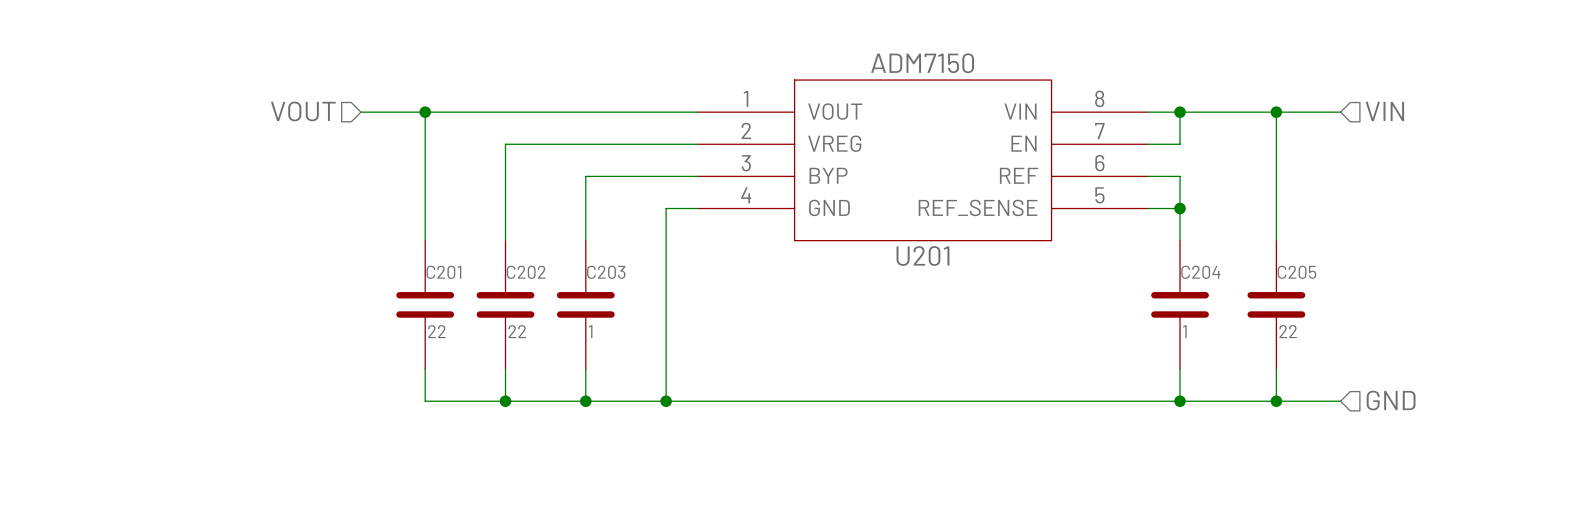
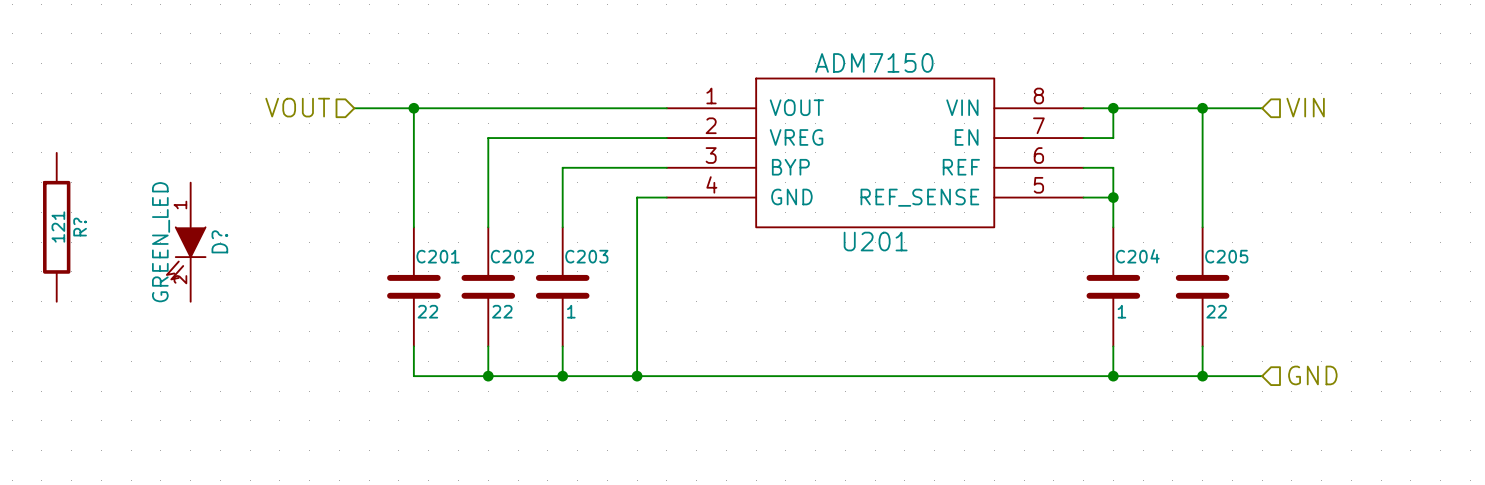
R?: none -> 121 (56, 227)
D?: none -> GREEN_LED (186, 242)

